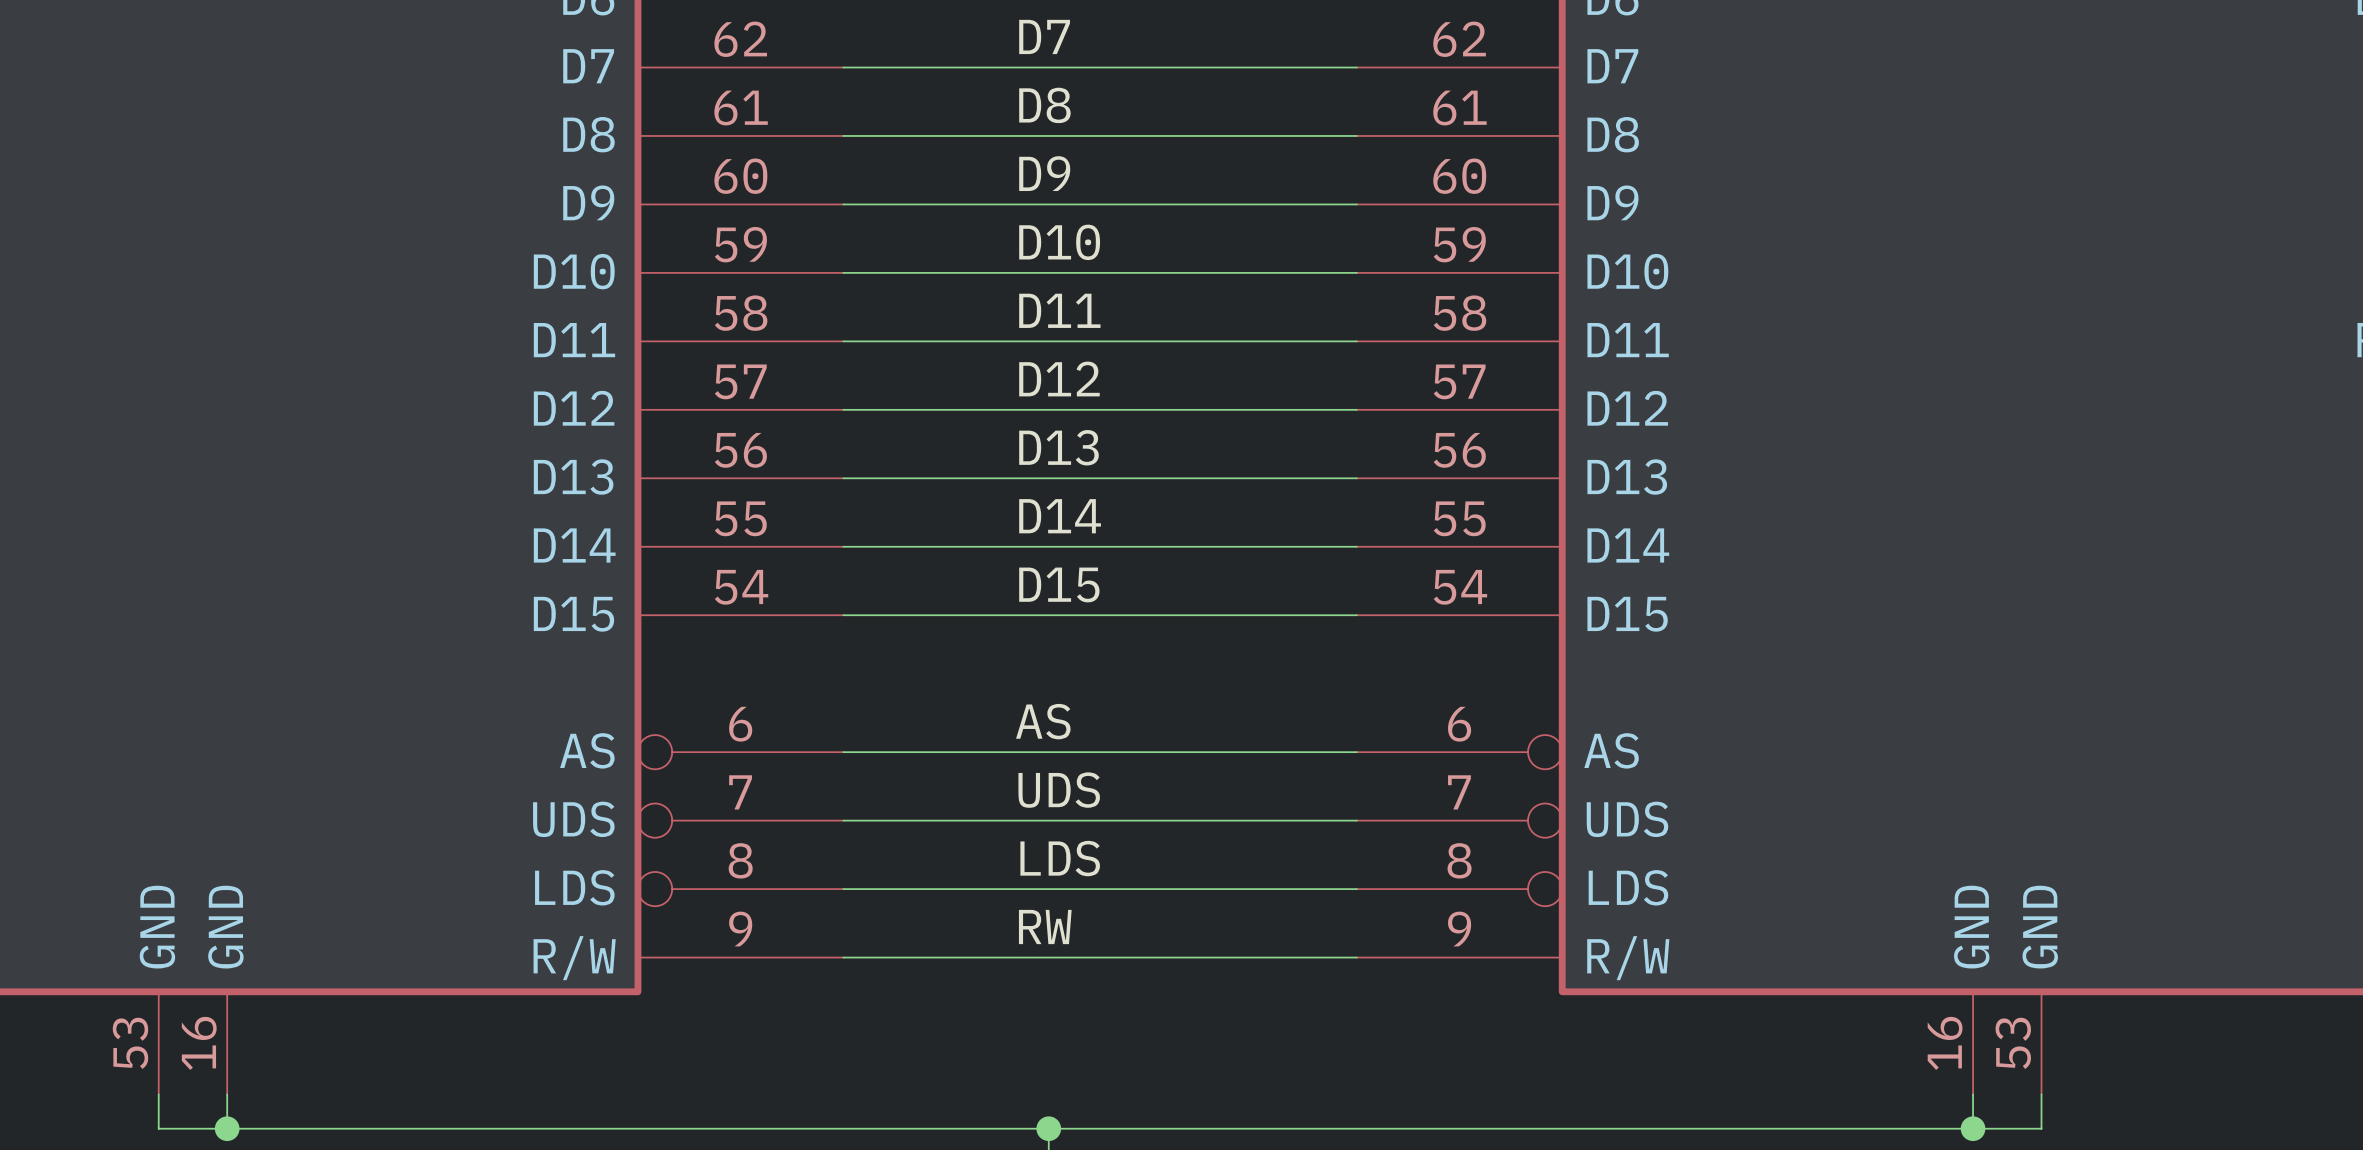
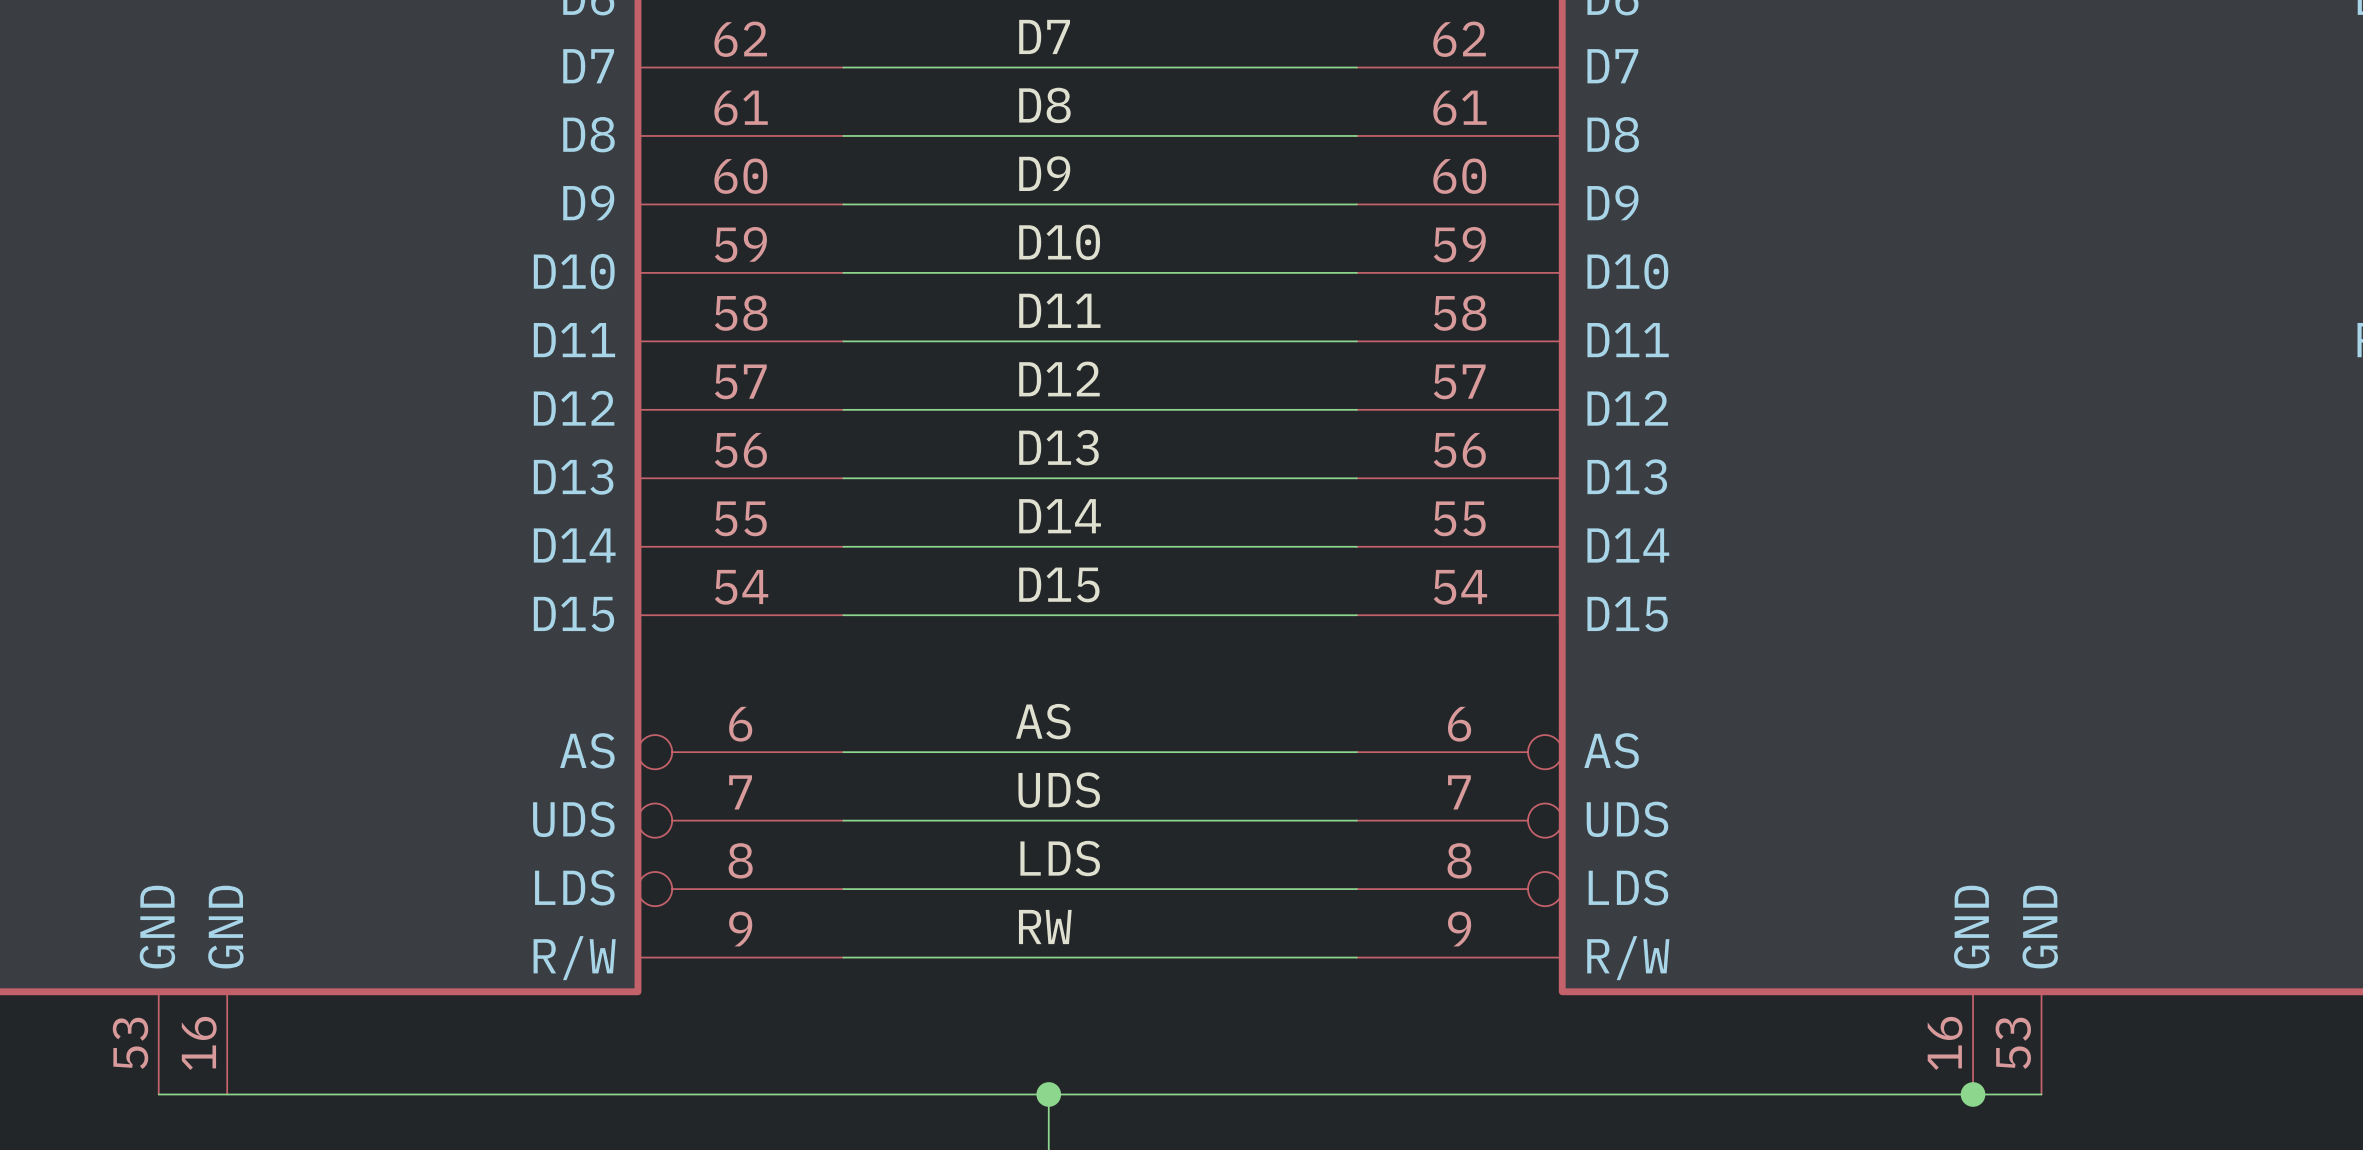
wire: (158, 1094) (158, 1128) (2041, 1128) (2041, 1094) -> (158, 1094) (2041, 1094)
wire: (227, 1094) (227, 1128) -> none
wire: none -> (1048, 1094) (1048, 1128)
wire: (1973, 1094) (1973, 1128) -> none
junction: (227, 1128) -> none
junction position: (1048, 1128) -> (1048, 1094)
junction position: (1973, 1128) -> (1973, 1094)

